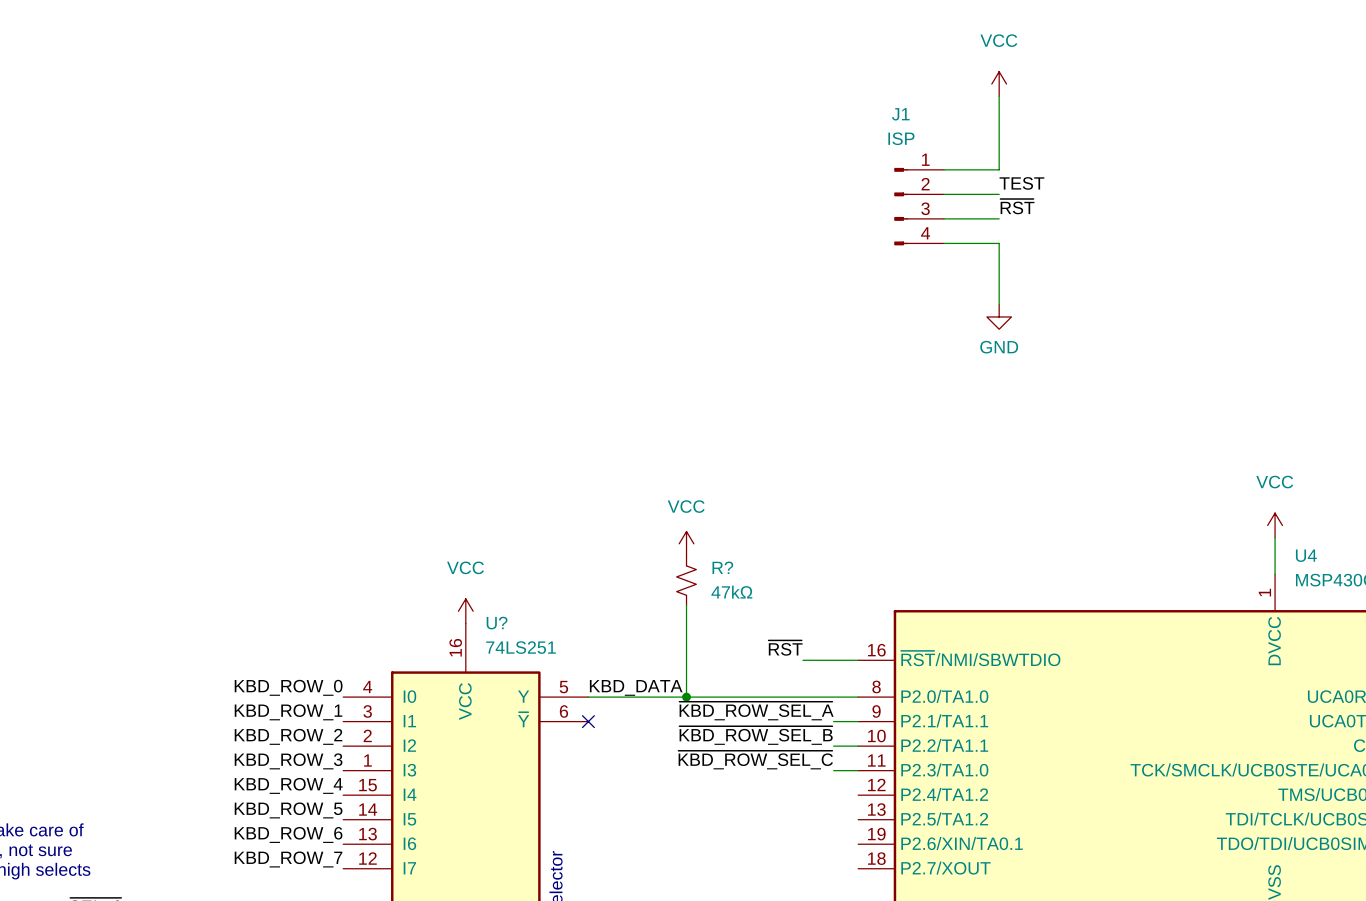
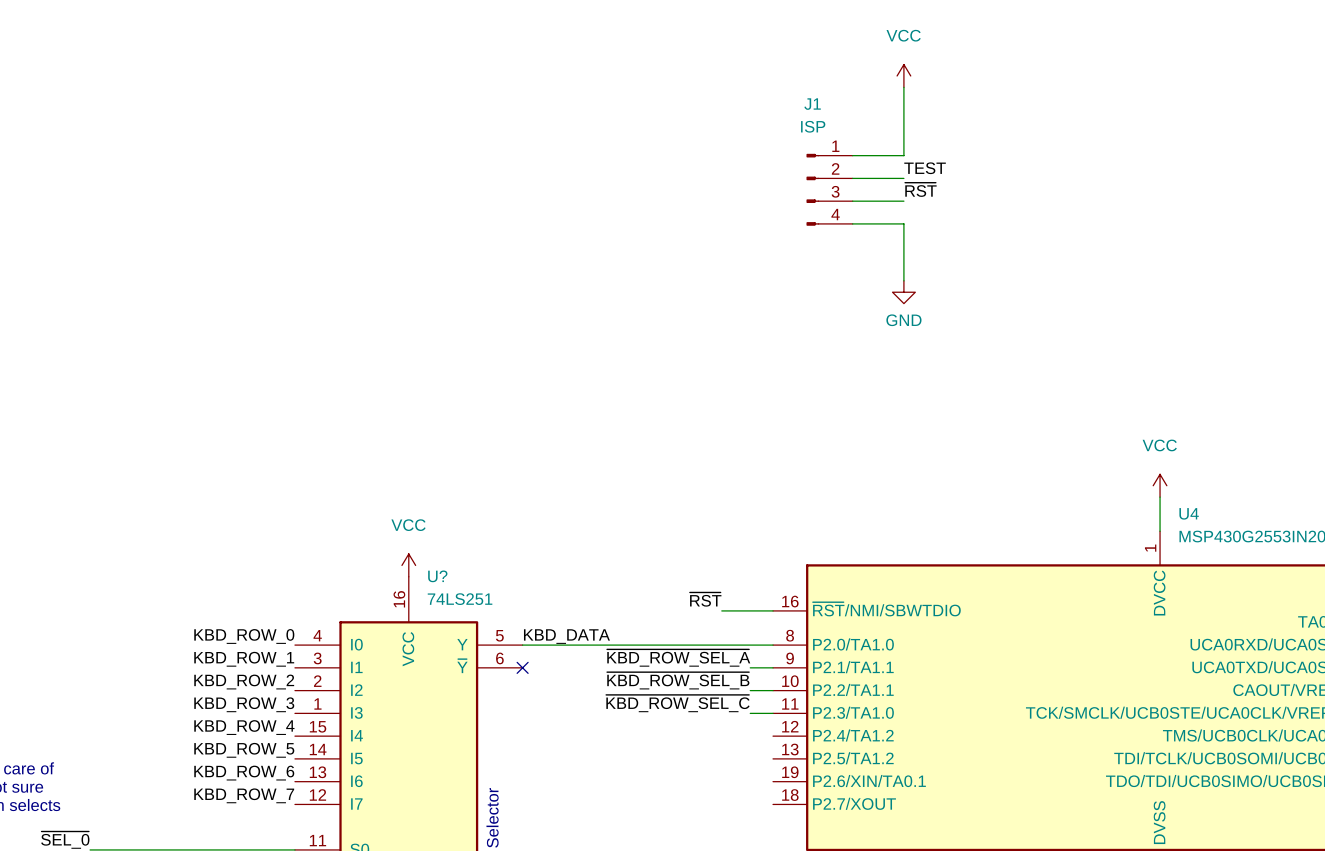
power symbol: VCC (686, 543) -> none
R?: 47kΩ (686, 580) -> none
wire: (686, 605) (686, 697) -> none
junction: (686, 697) -> none

